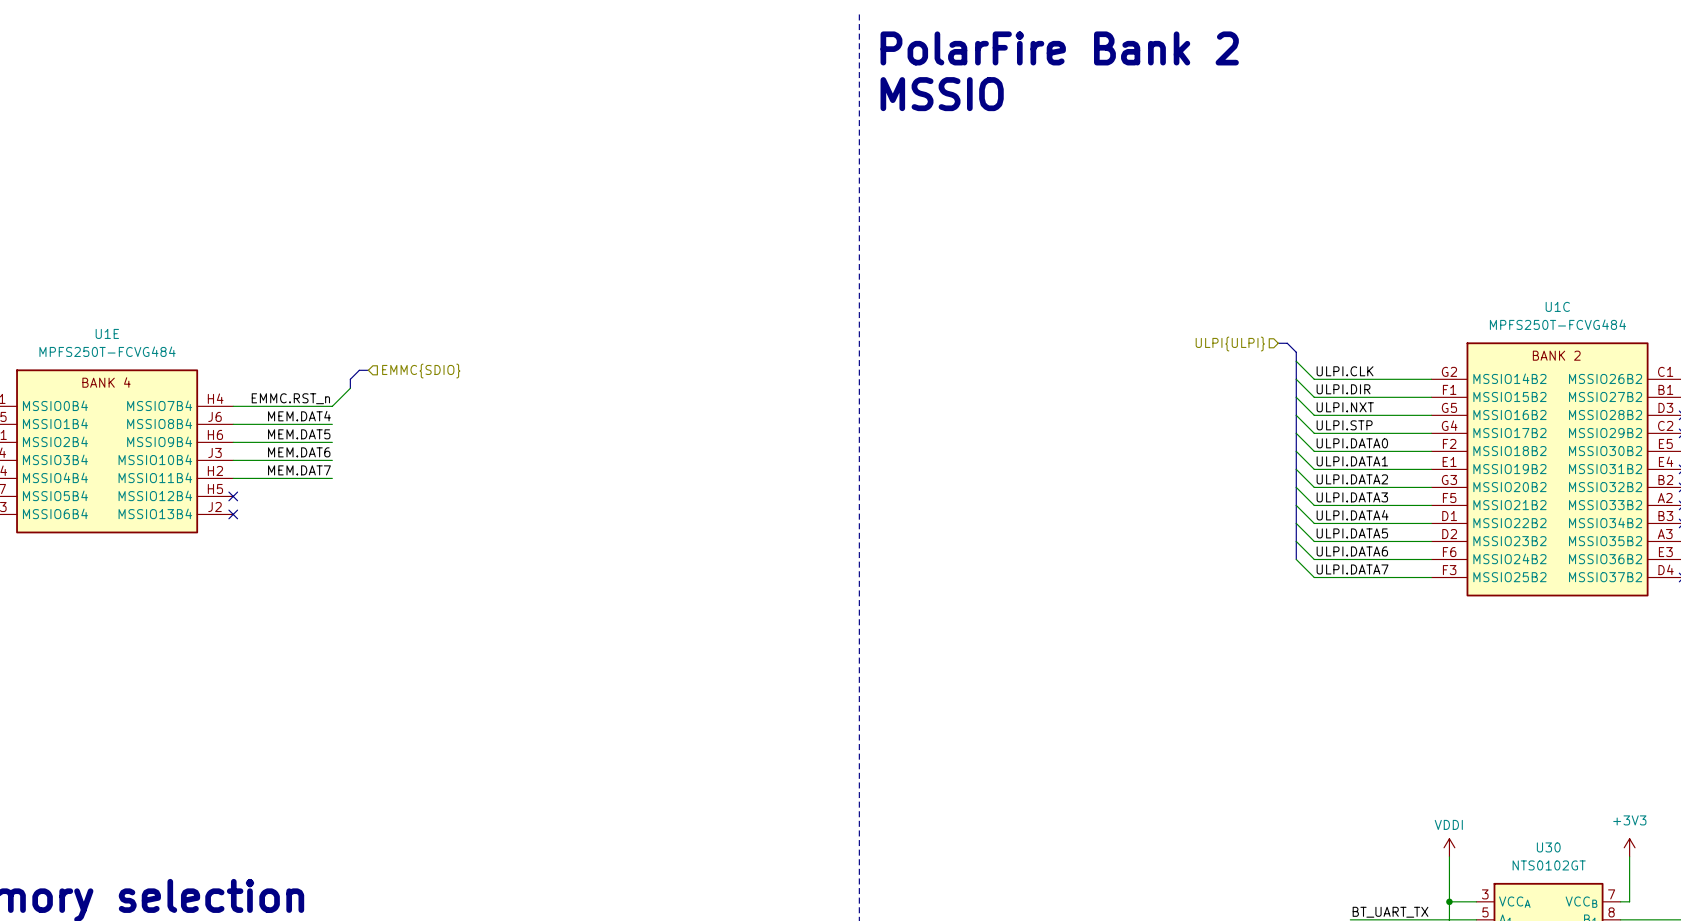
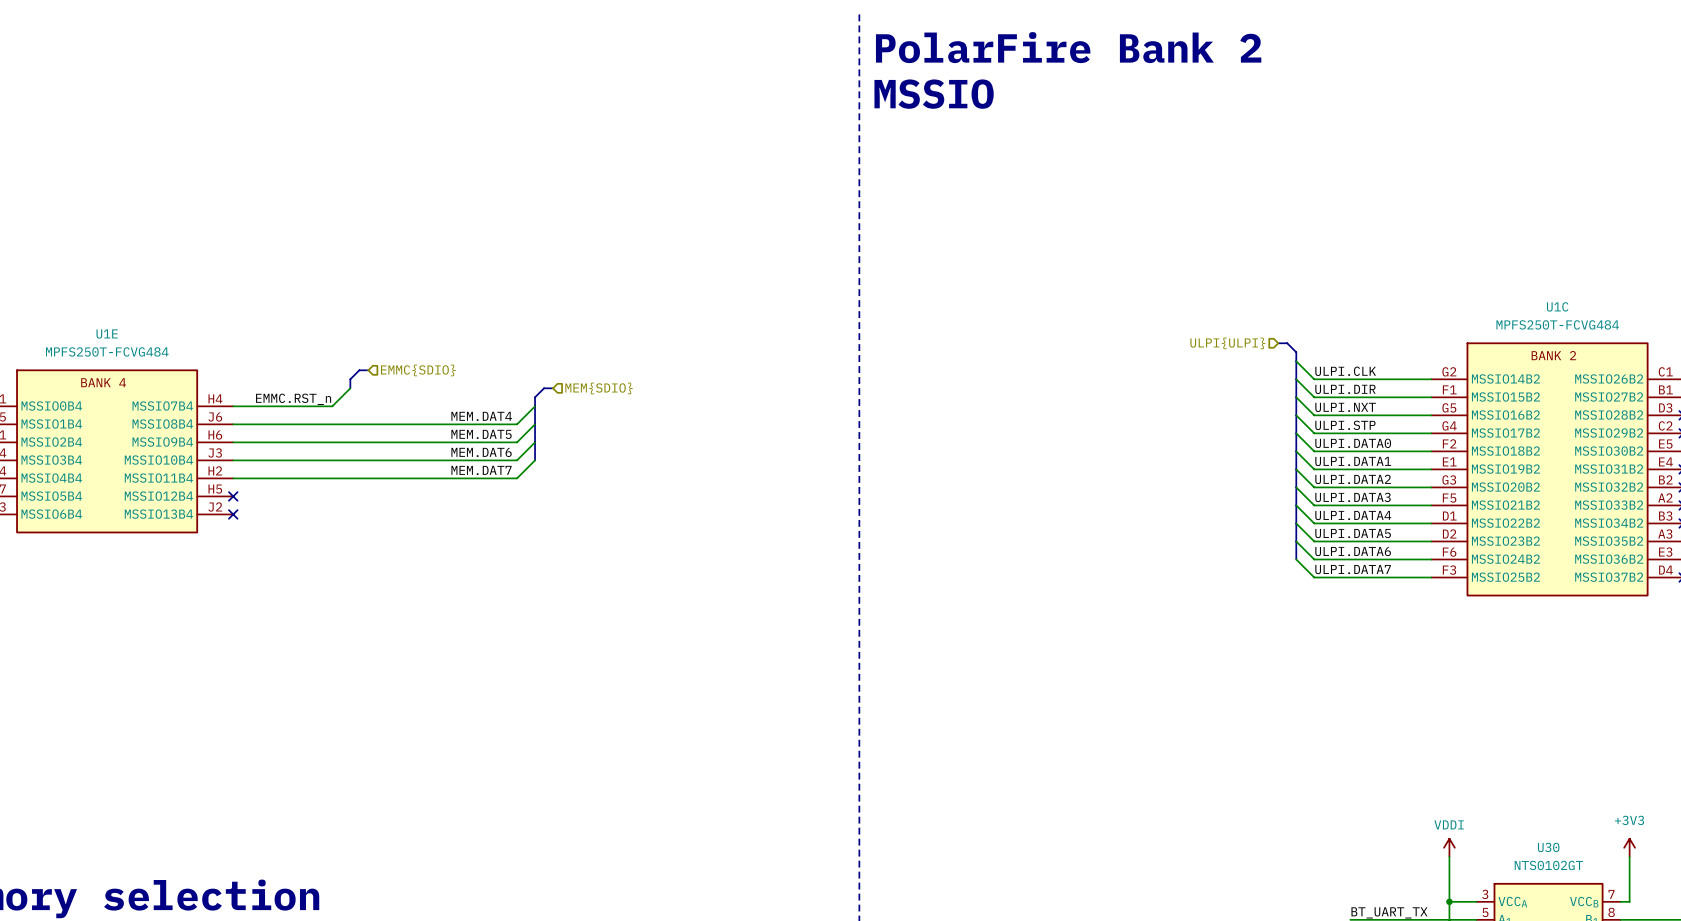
bus: none -> (553, 388) (544, 388) (535, 397) (535, 460)
hierarchical label: none -> MEM{SDIO} (599, 388)
wire: none -> (535, 406) (517, 424) (332, 424)
label: MEM.DAT4 (299, 416) -> none
label: none -> MEM.DAT4 (481, 416)
wire: none -> (535, 424) (517, 442) (332, 442)
label: MEM.DAT5 (299, 434) -> none
label: none -> MEM.DAT5 (481, 434)
wire: none -> (535, 442) (517, 460) (332, 460)
label: MEM.DAT6 (299, 452) -> none
label: none -> MEM.DAT6 (481, 452)
wire: none -> (535, 460) (517, 478) (332, 478)
label: MEM.DAT7 (299, 470) -> none
label: none -> MEM.DAT7 (481, 470)

